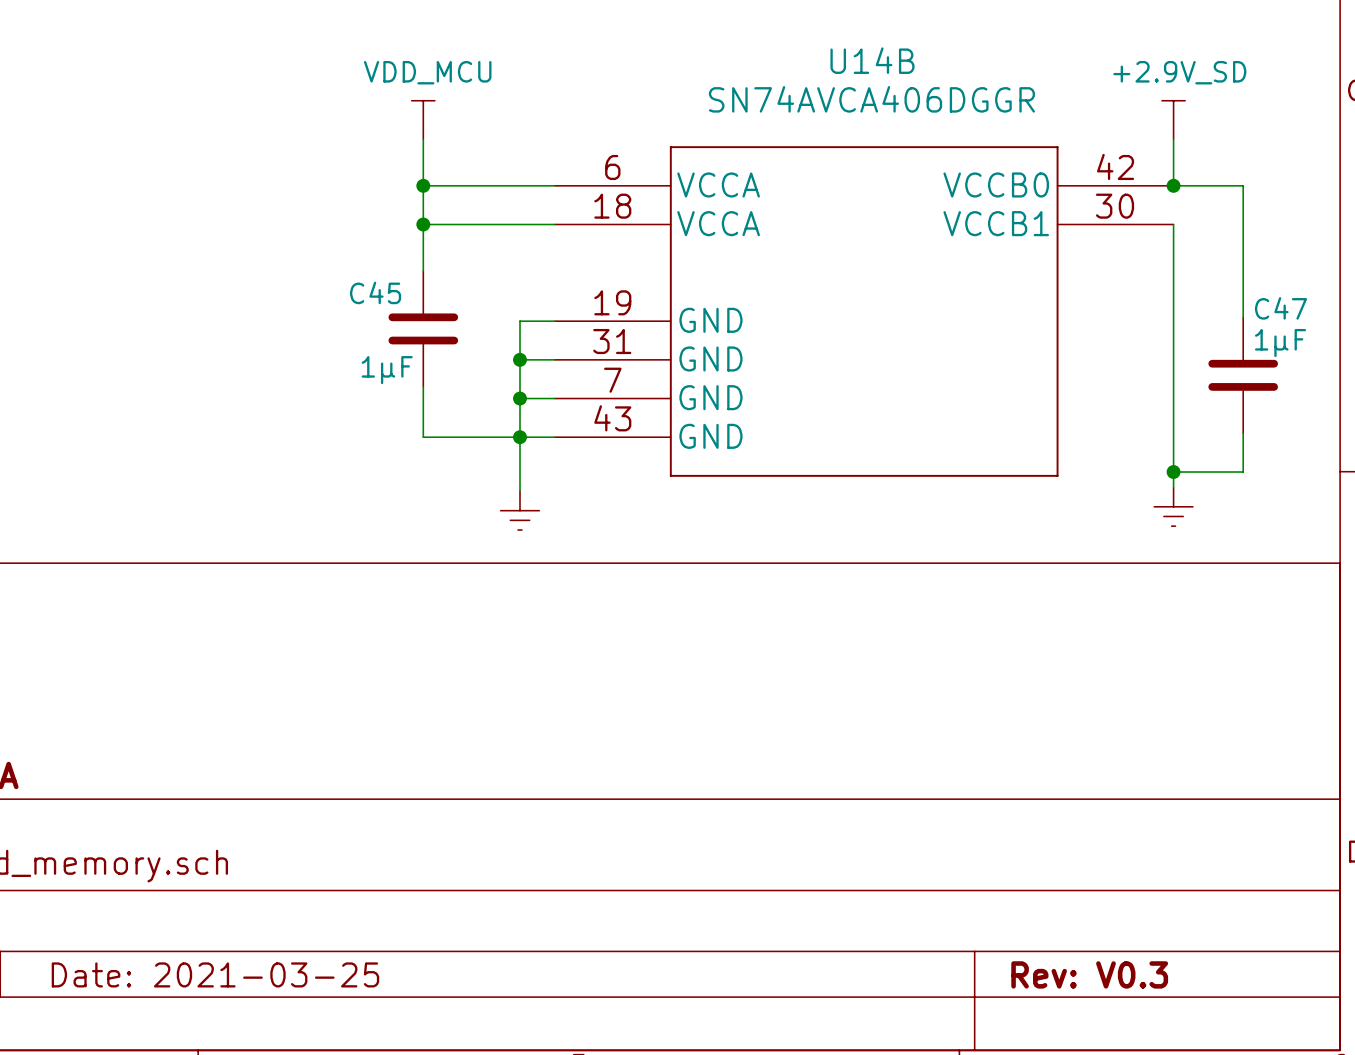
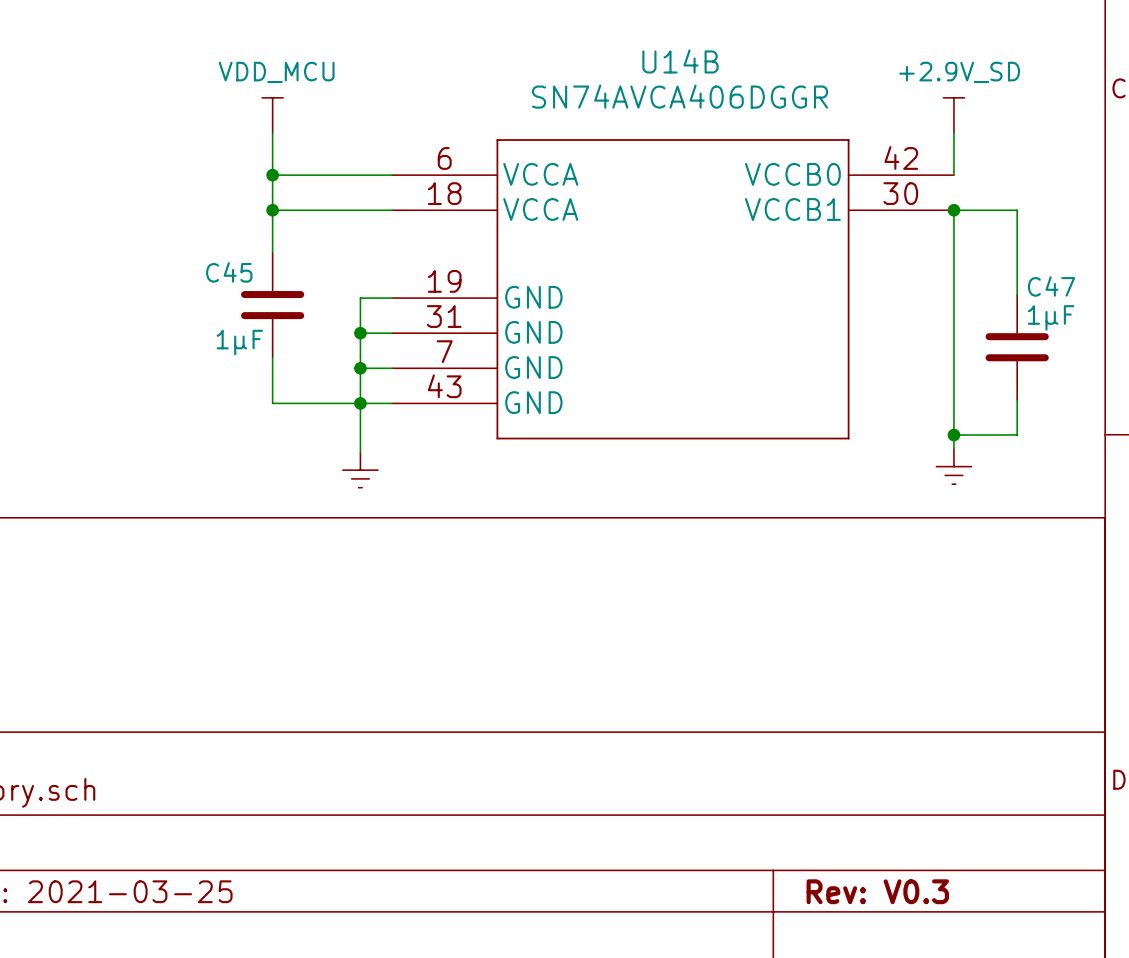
wire: (1173, 185) (1243, 185) (1243, 224) -> (953, 210) (1017, 210)
junction position: (1173, 185) -> (953, 210)

